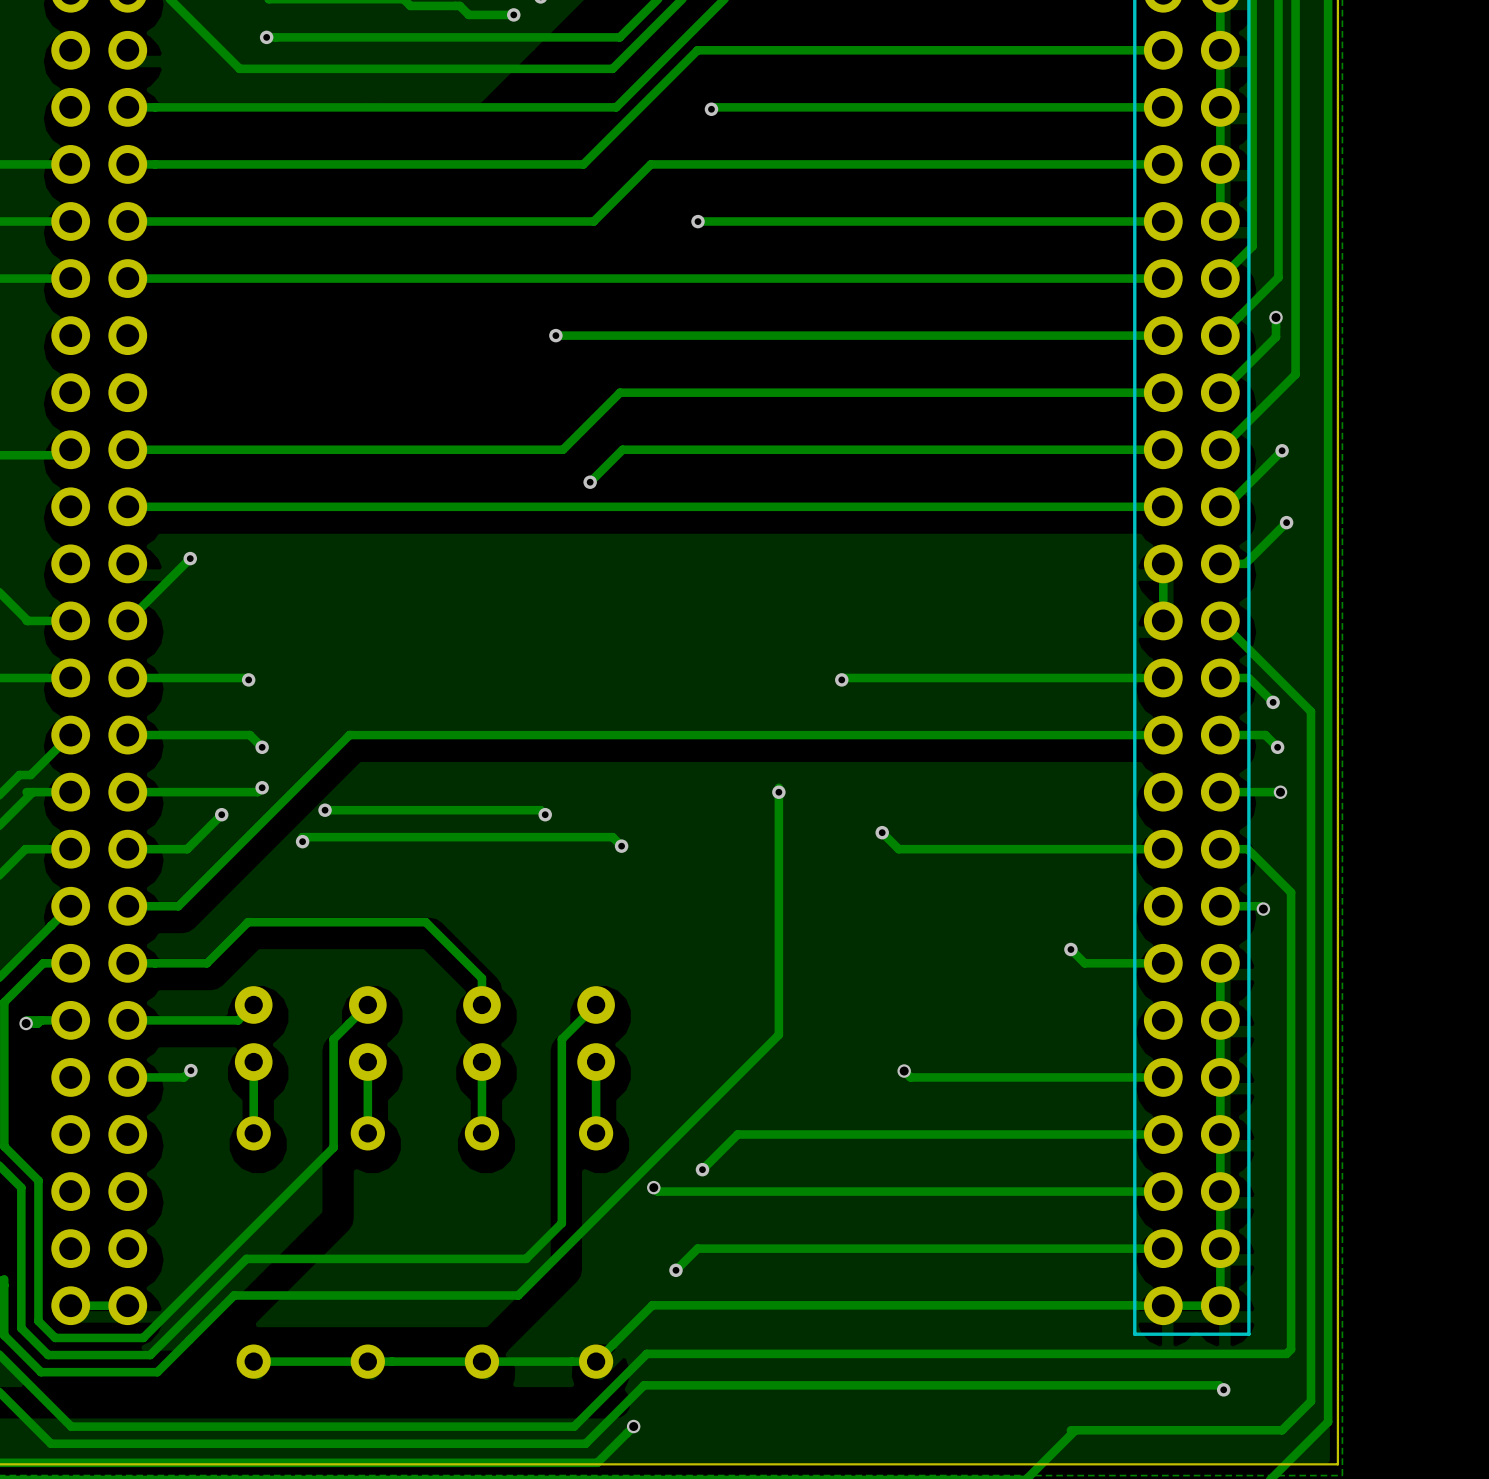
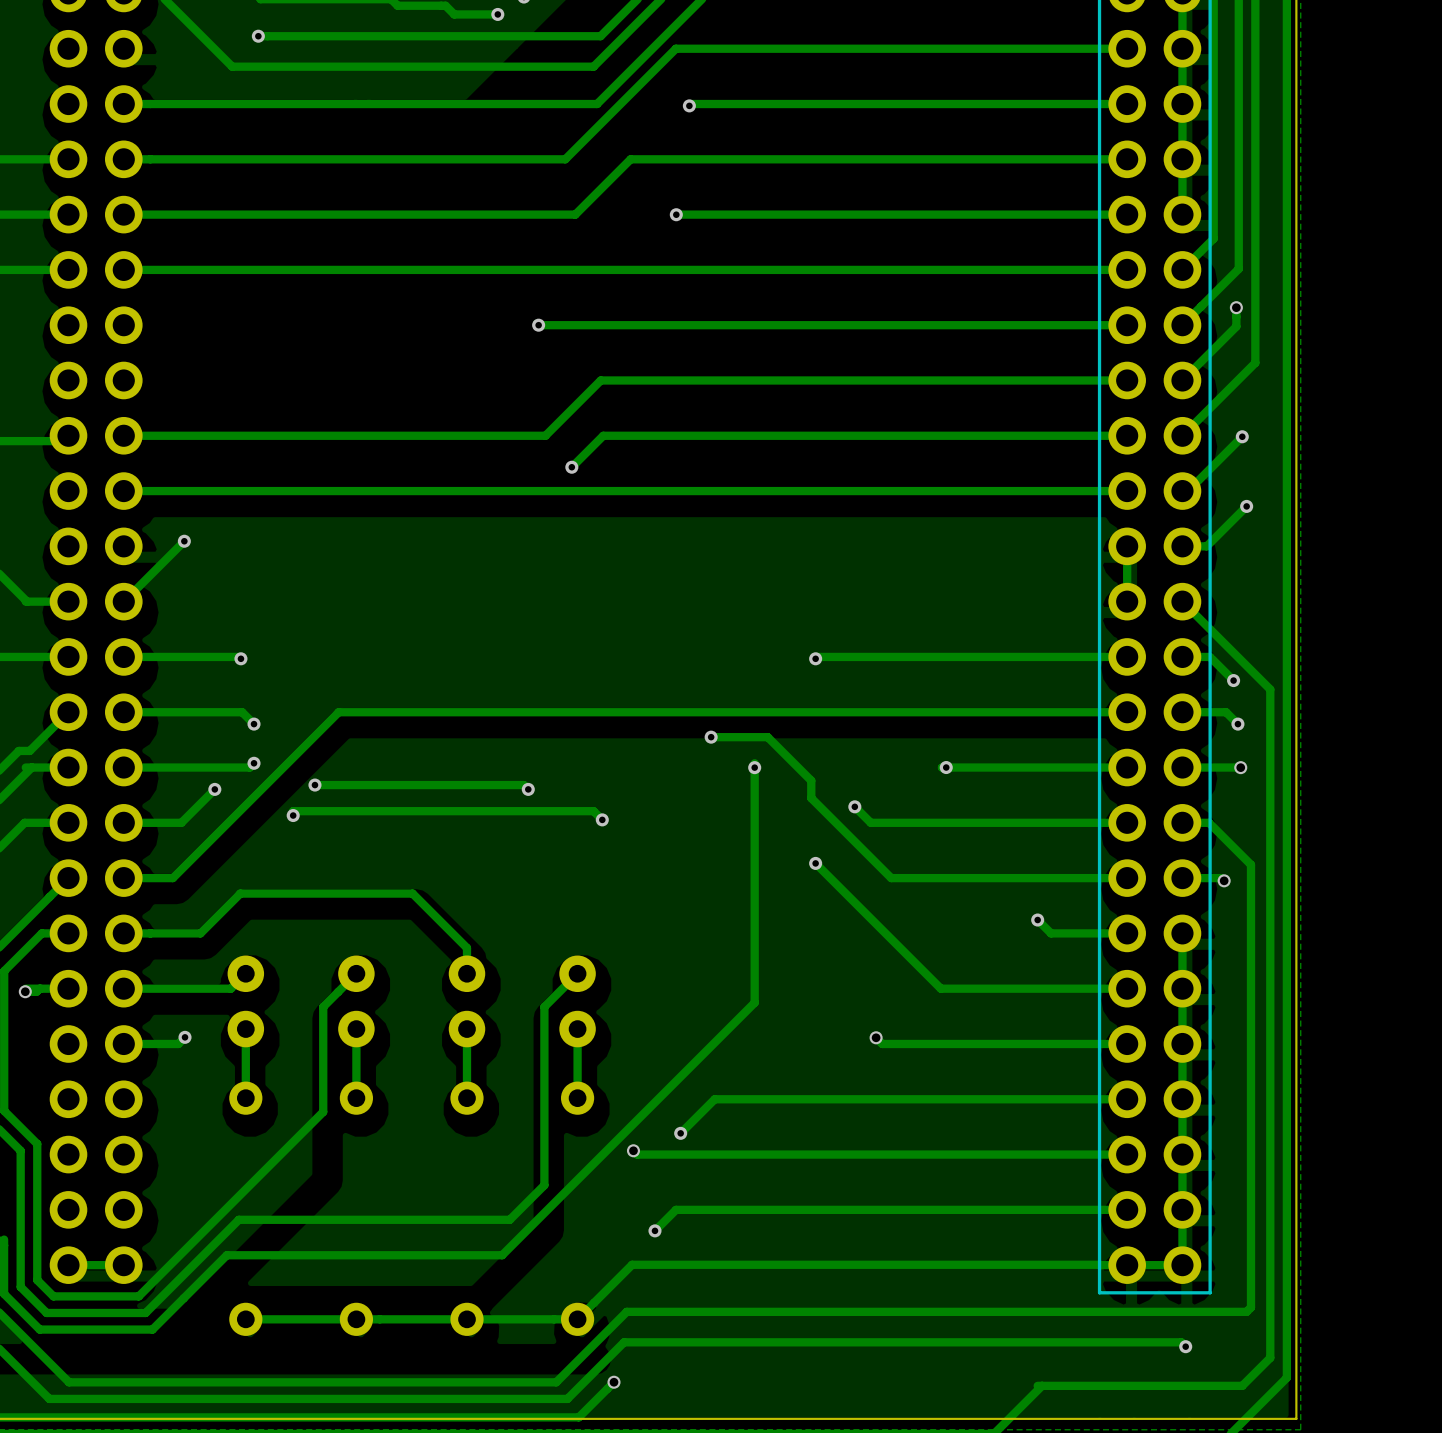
track: none -> (711, 737) (767, 737) (811, 780) (811, 798) (891, 878) (1127, 878)
via: none -> (711, 737)
via: none -> (946, 767)
track: none -> (1127, 767) (942, 767)
track: none -> (815, 863) (940, 988) (1127, 988)
via: none -> (815, 863)

